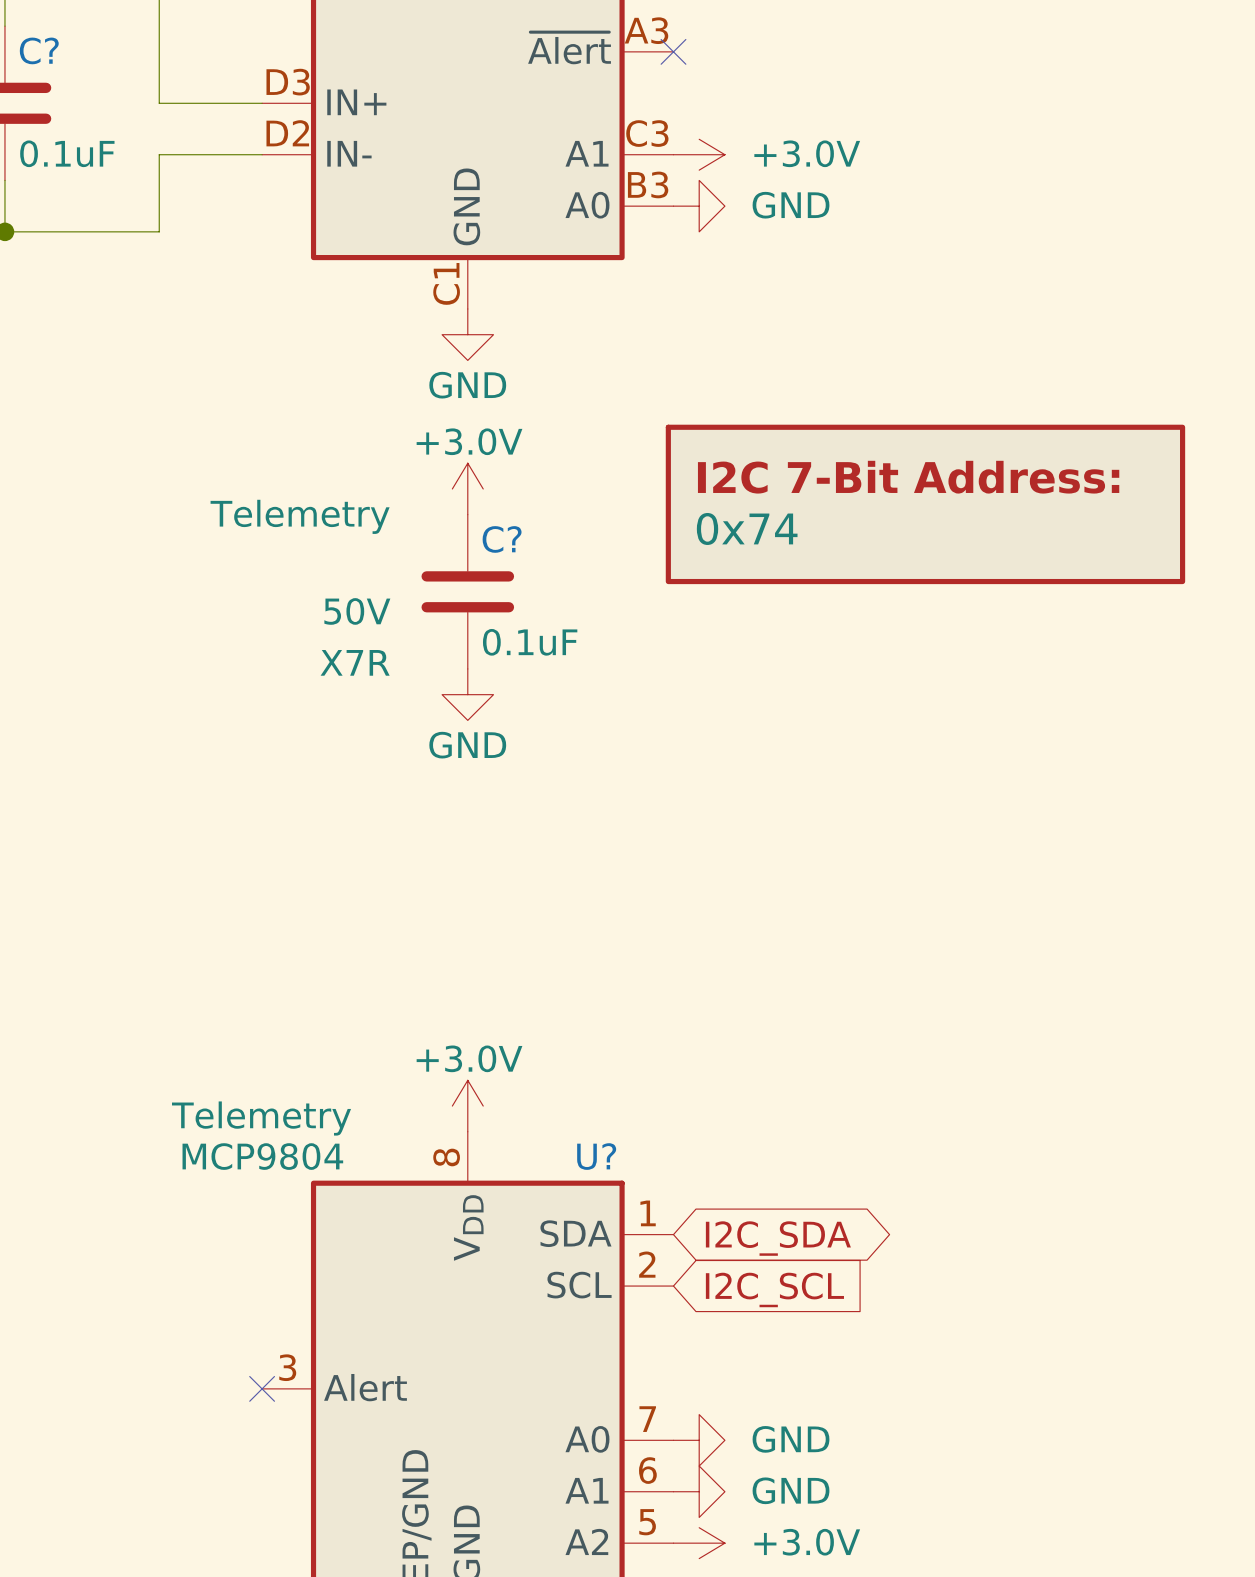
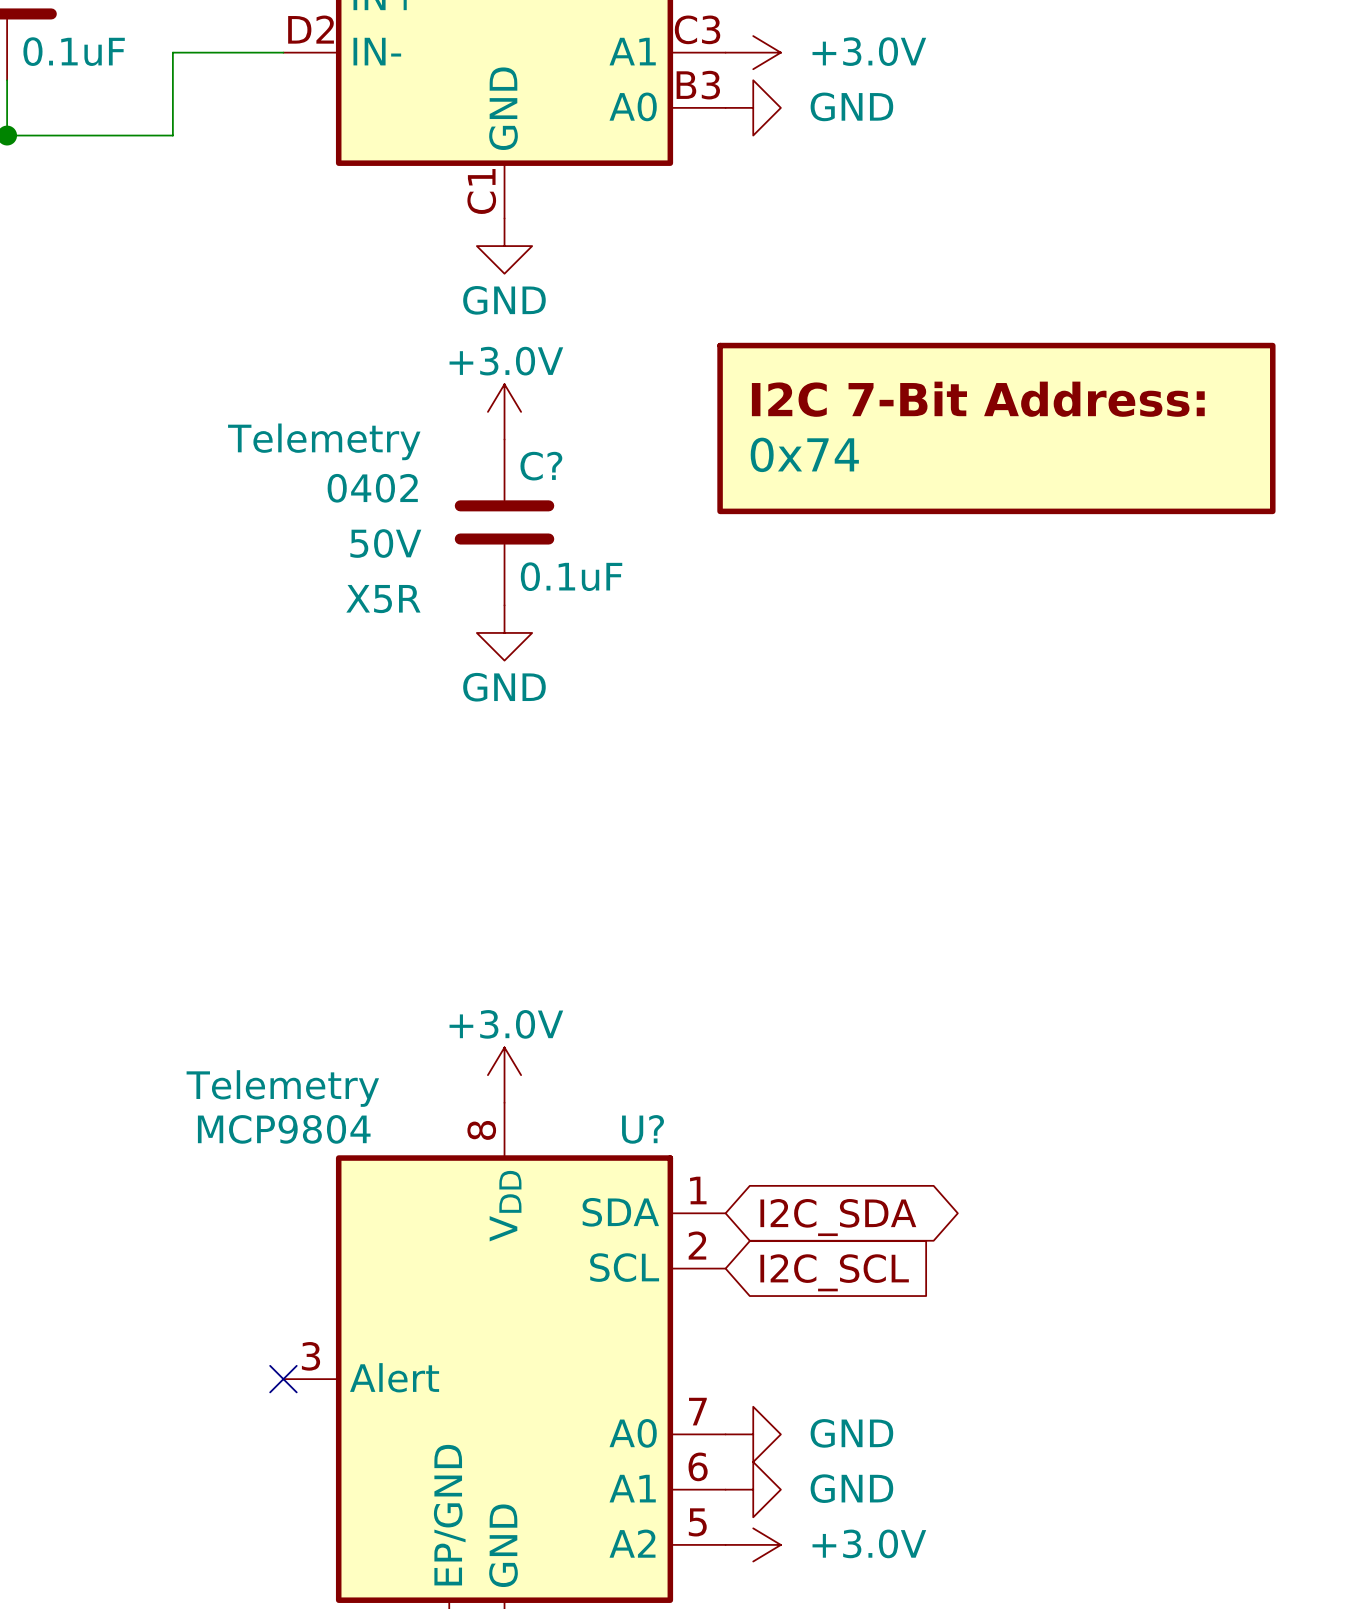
C? text: none -> 0402 (372, 488)
C? text: X7R (355, 662) -> X5R (383, 599)

